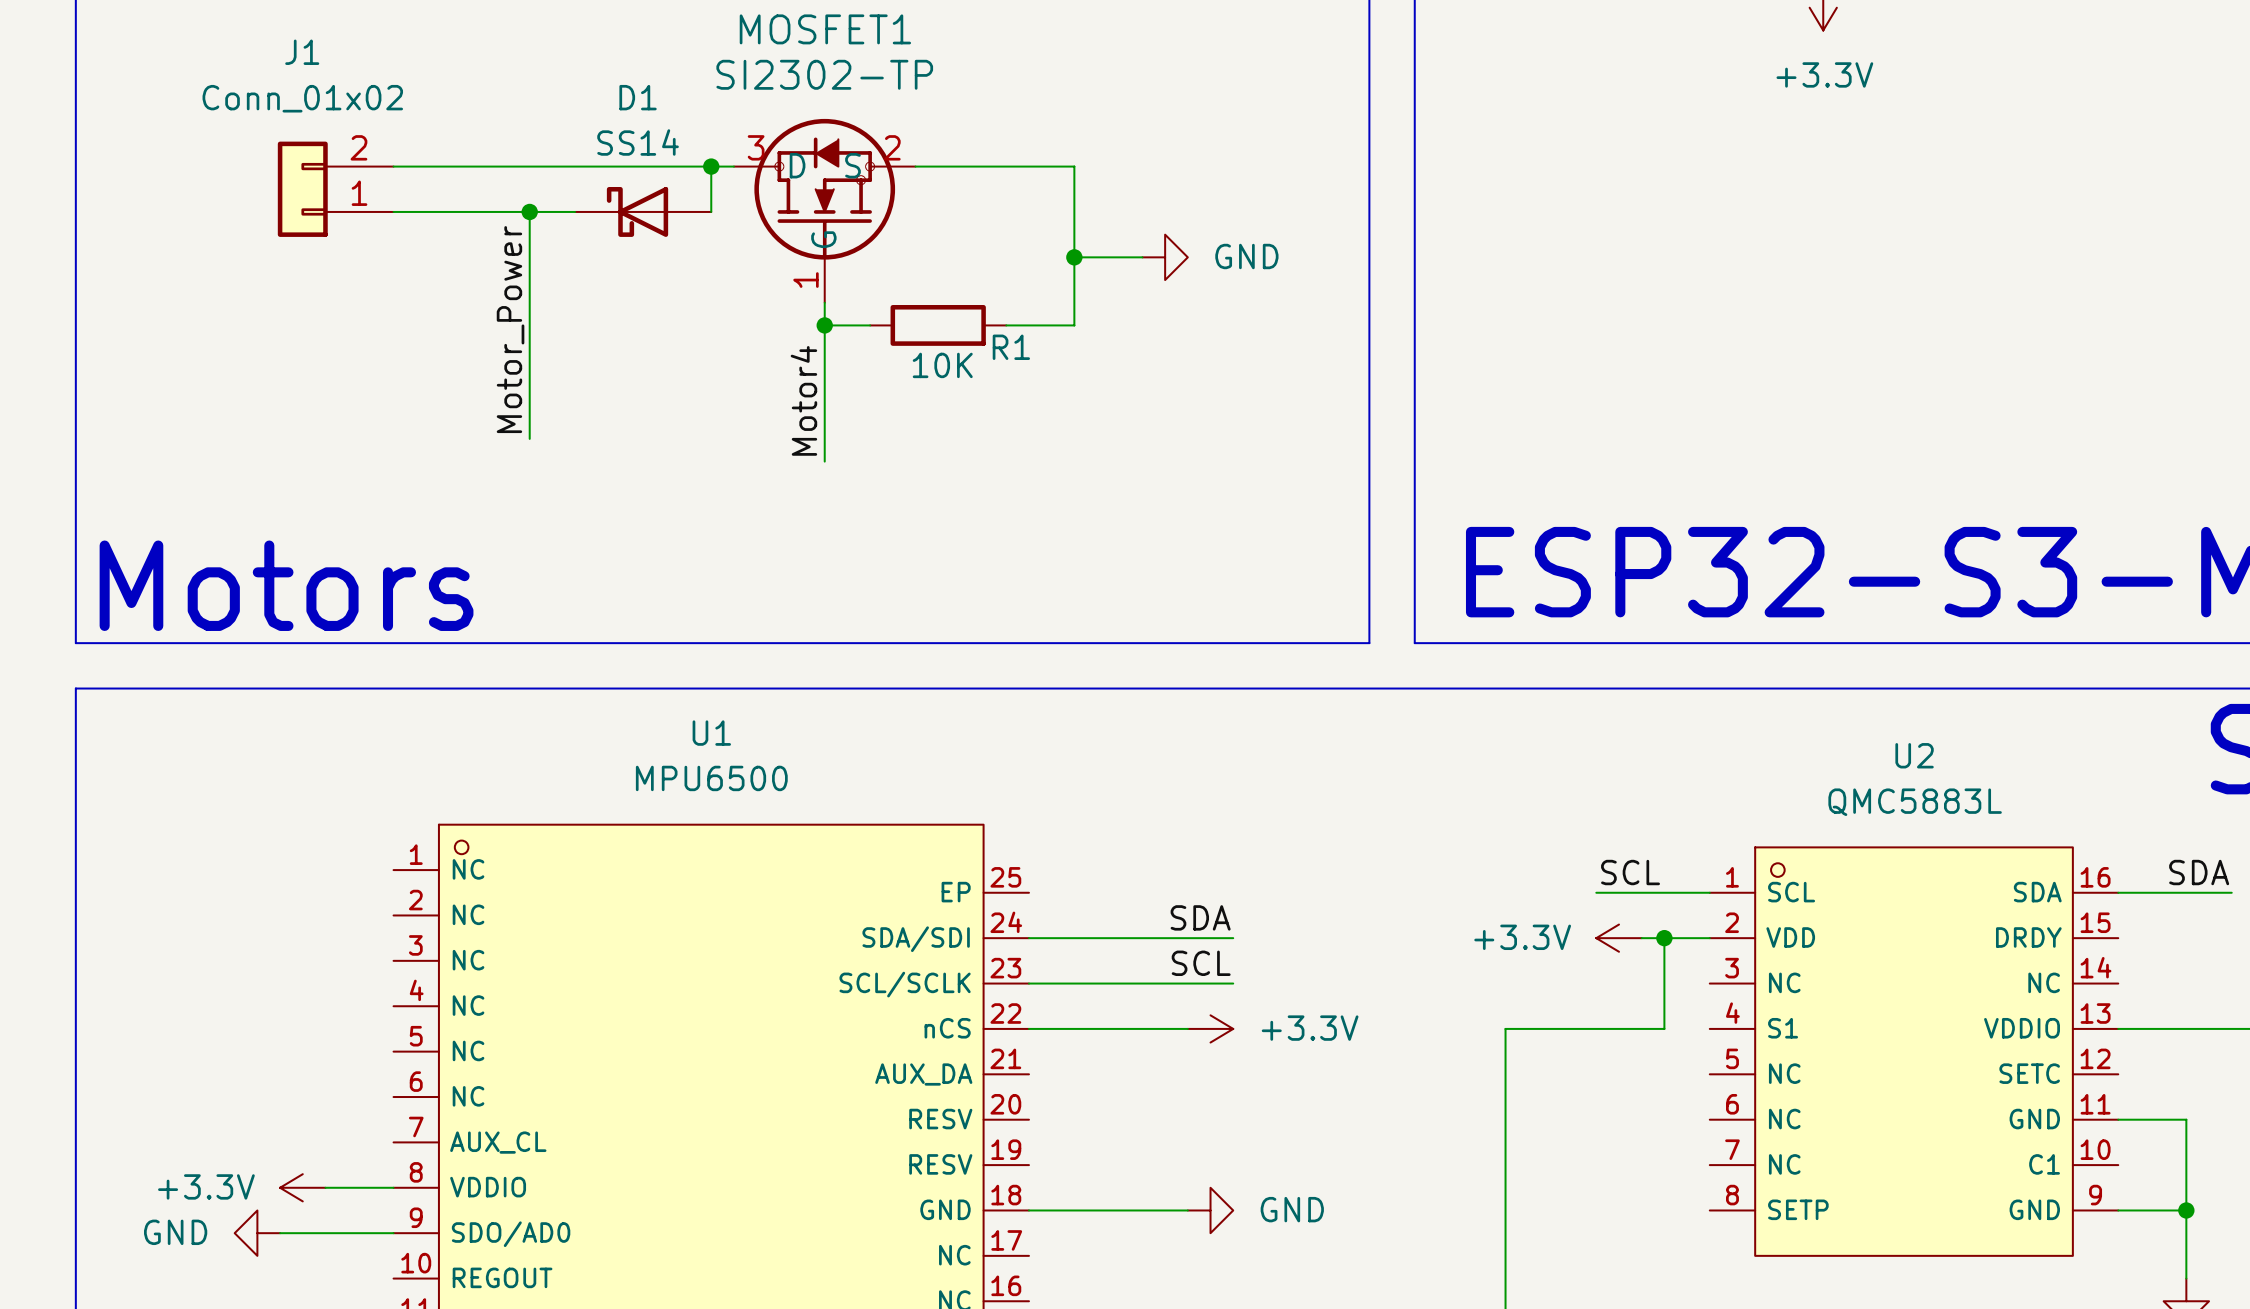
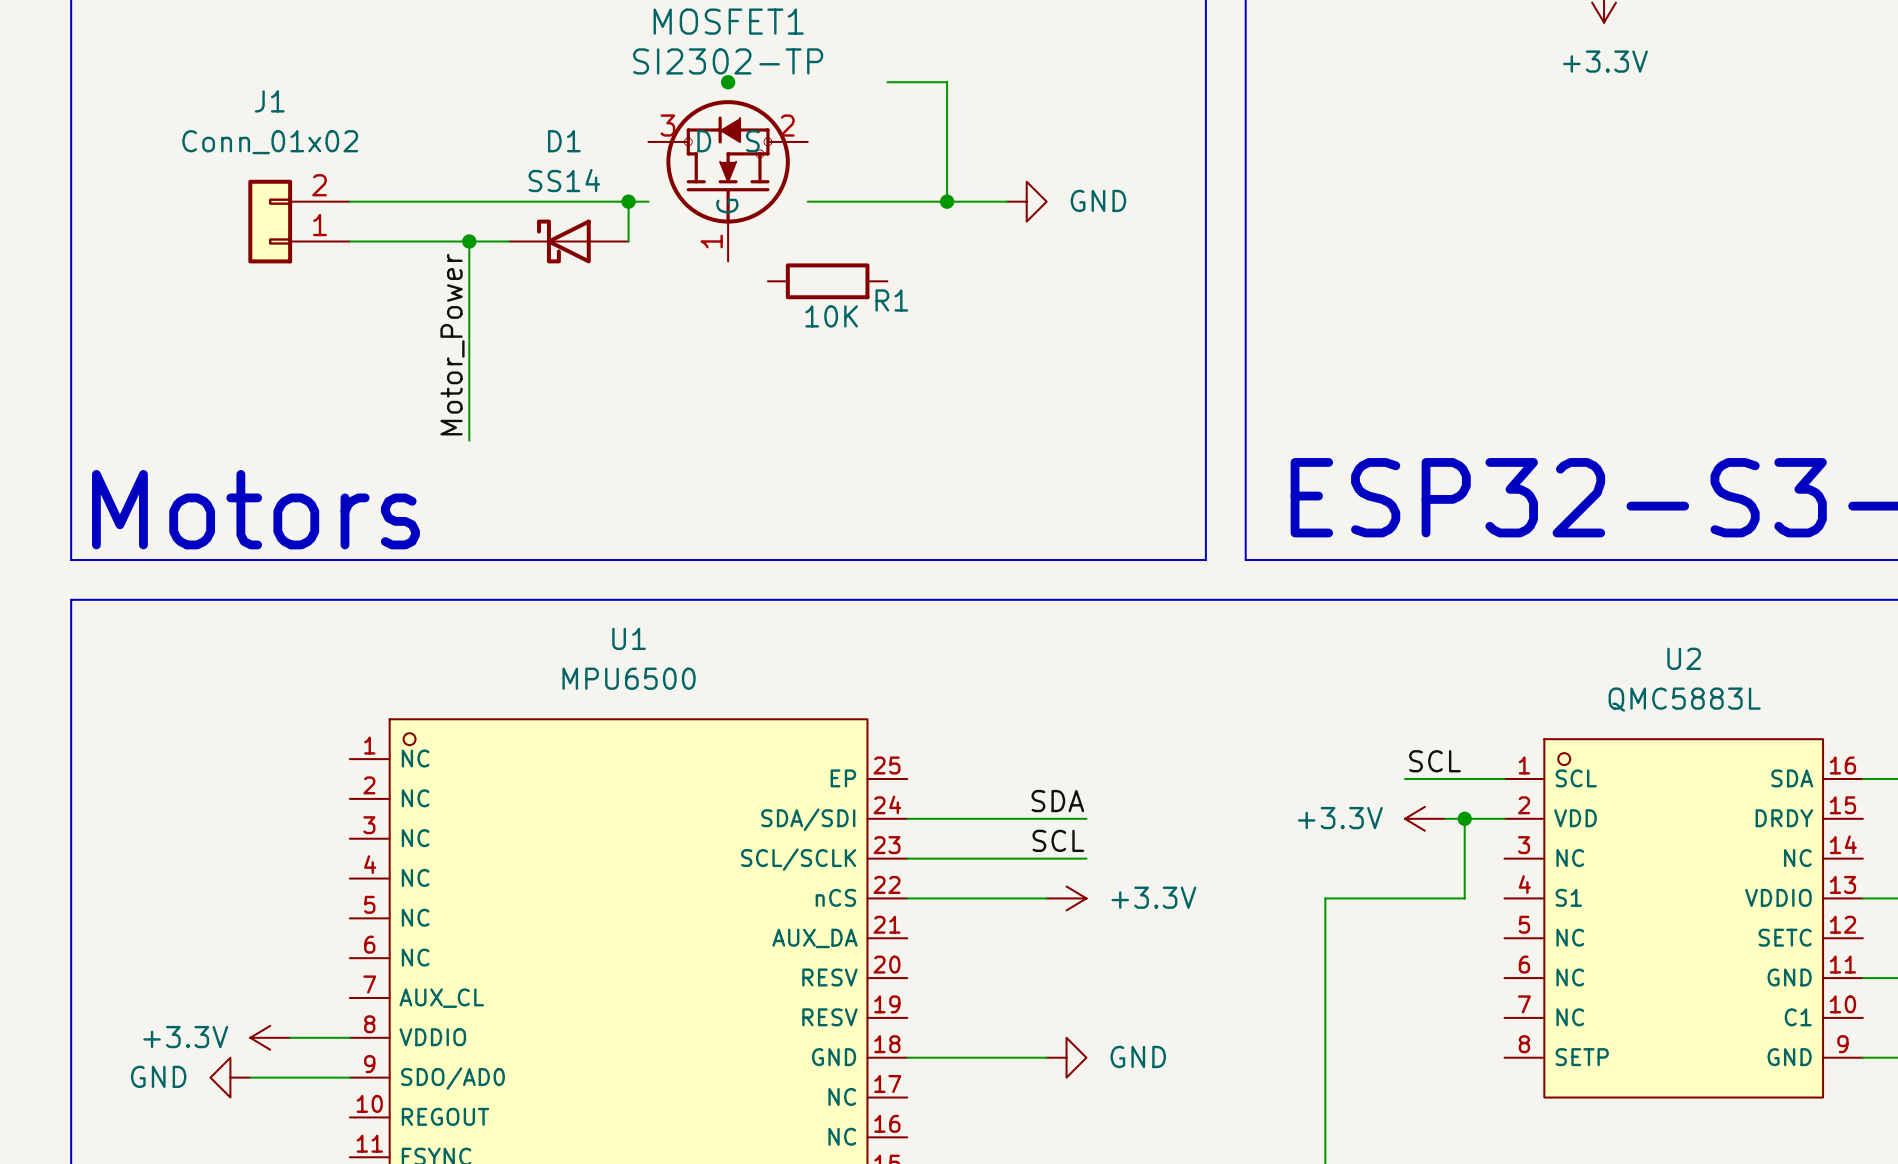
junction: none -> (728, 82)
wire: (393, 166) (733, 166) -> (349, 201) (648, 201)
wire: (711, 166) (711, 211) -> (628, 201) (628, 241)
junction: (711, 166) -> none
wire: (915, 166) (1074, 166) -> (887, 82) (947, 82) (947, 141)
J1 position: (335, 189) -> (299, 221)
wire: (393, 211) (575, 211) -> (349, 241) (509, 241)
wire: (529, 211) (529, 280) -> (469, 380) (469, 440)
junction position: (529, 211) -> (469, 241)
D1 position: (643, 211) -> (568, 241)
junction: none -> (628, 201)
wire: none -> (807, 201) (1006, 201)
wire: (1074, 234) (1074, 325) (1006, 325) -> none
wire: (1074, 257) (1142, 257) -> none
junction position: (1074, 257) -> (947, 201)
power symbol position: GND (1165, 257) -> GND (1026, 201)
wire: (824, 302) (824, 461) -> none
wire: (824, 325) (870, 325) -> none
junction: (824, 325) -> none
label position: Motor_Power (510, 329) -> Motor_Power (452, 344)
label: Motor4 (803, 400) -> none

